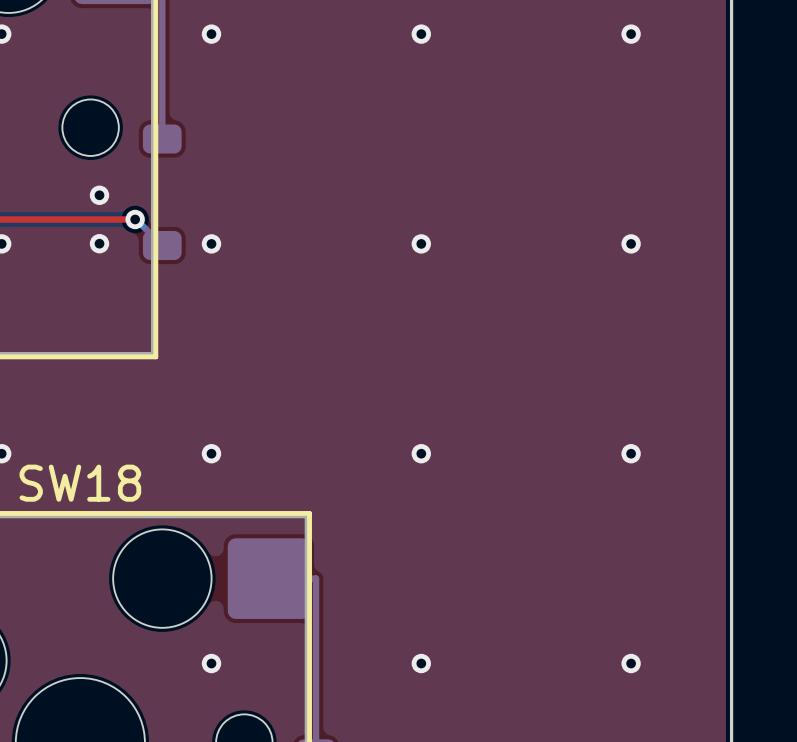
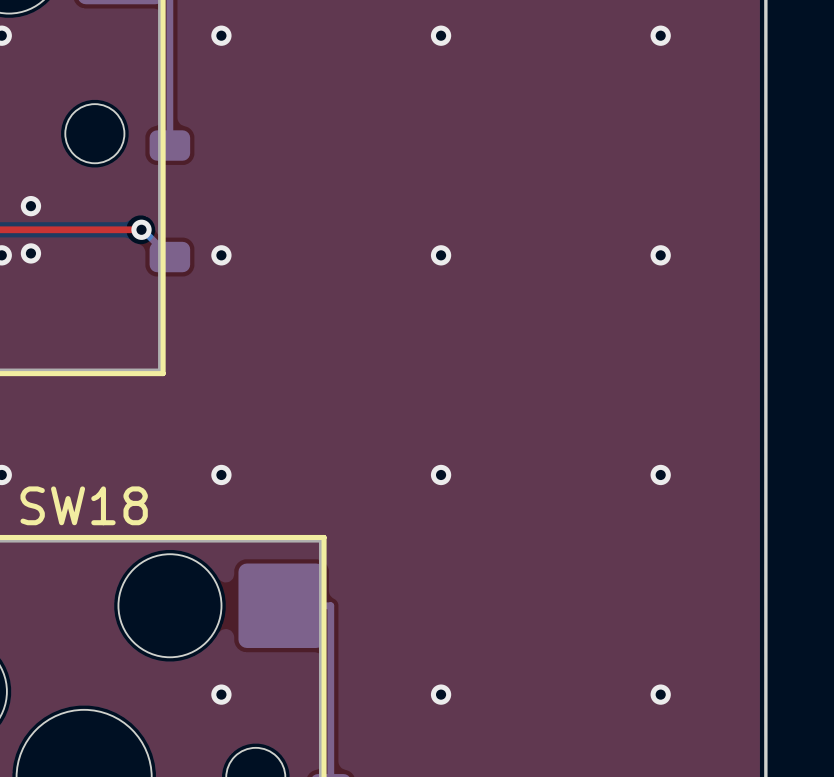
via: (99, 195) -> none
via: none -> (30, 206)
via: none -> (30, 253)
via: (99, 243) -> none

